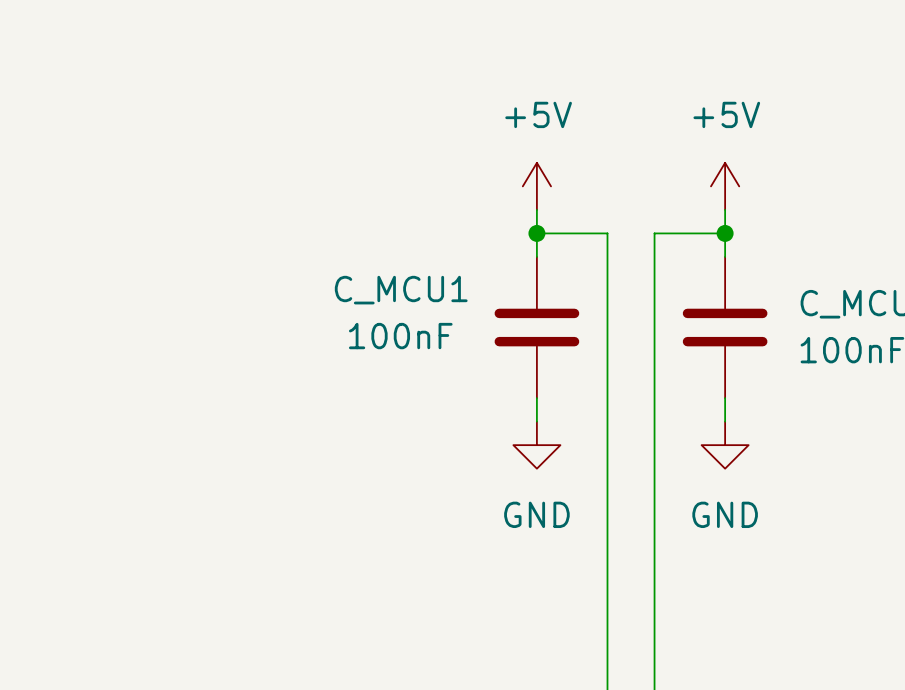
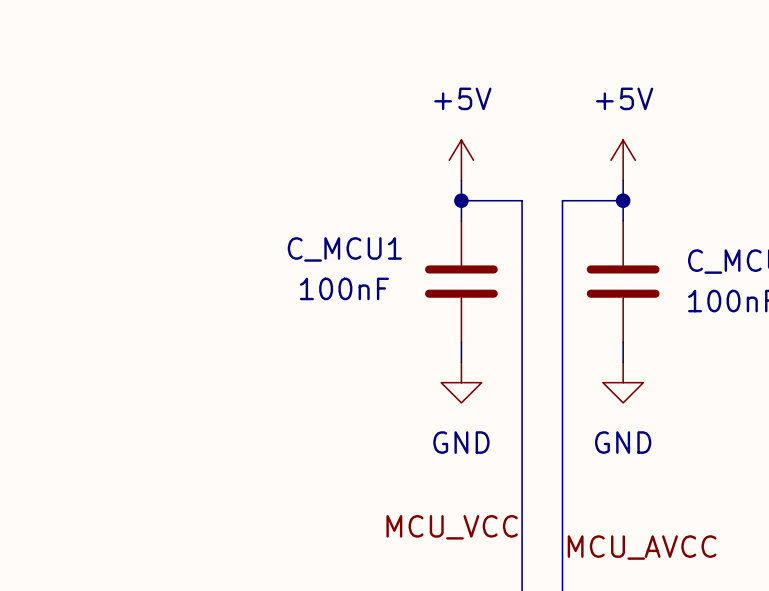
label: none -> MCU_VCC (452, 527)
label: none -> MCU_AVCC (642, 547)

